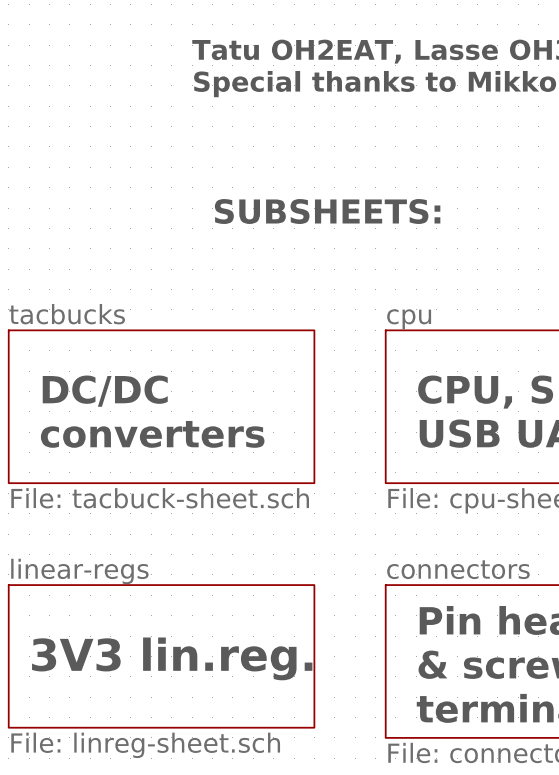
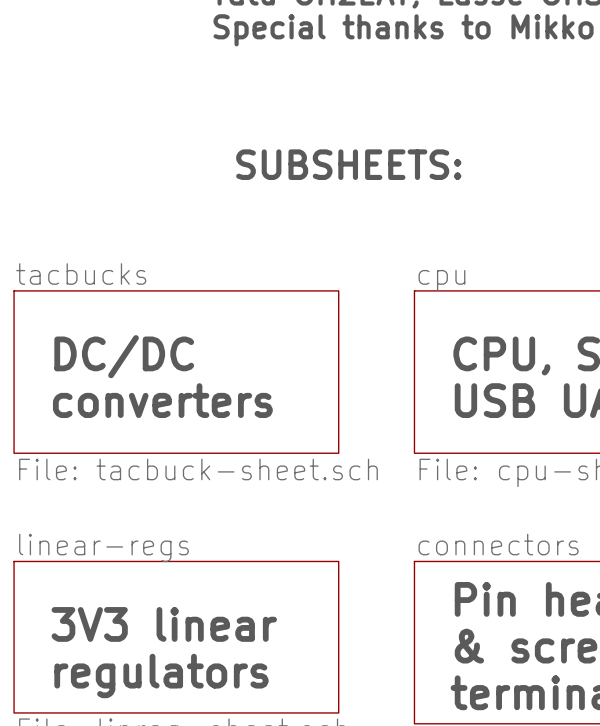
text: 3V3 lin.reg. (172, 658) -> 3V3 linear (164, 624)
text: none -> regulators (161, 675)

